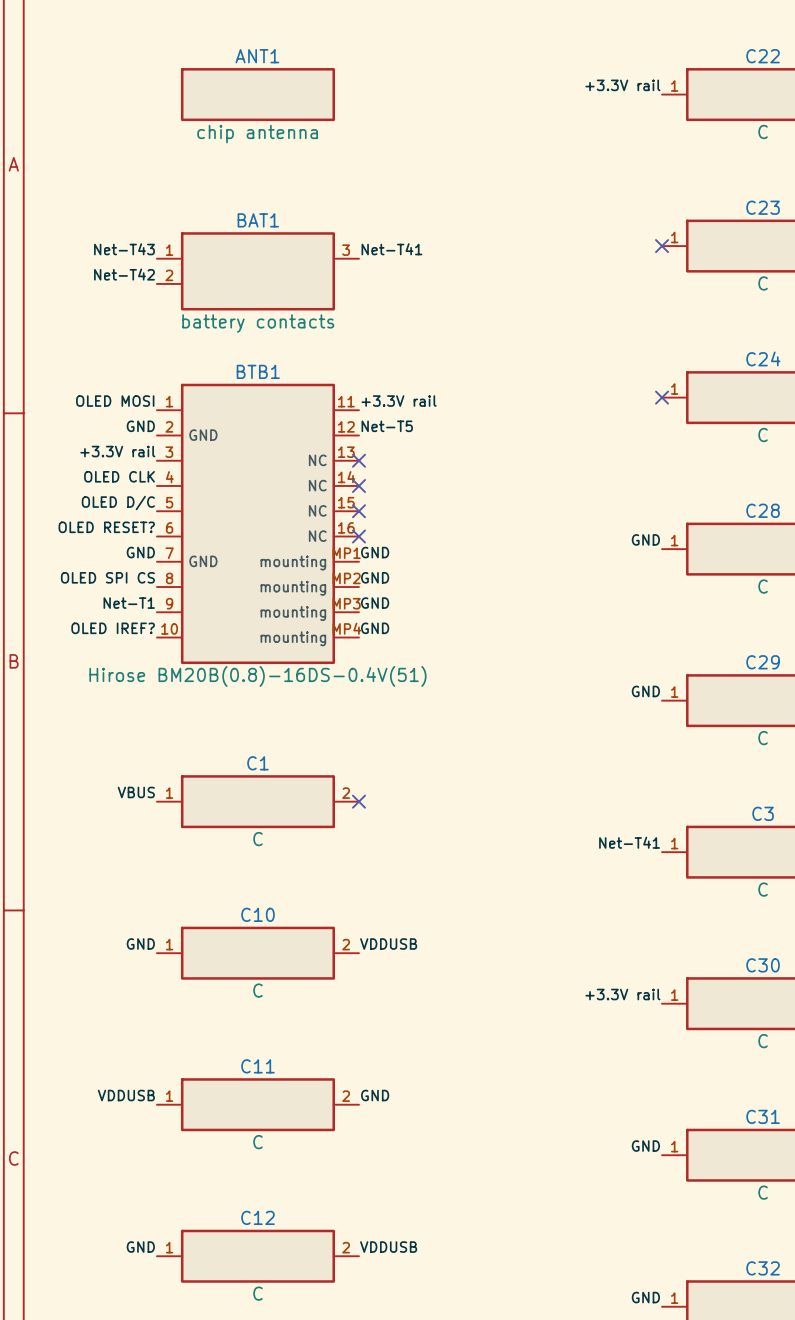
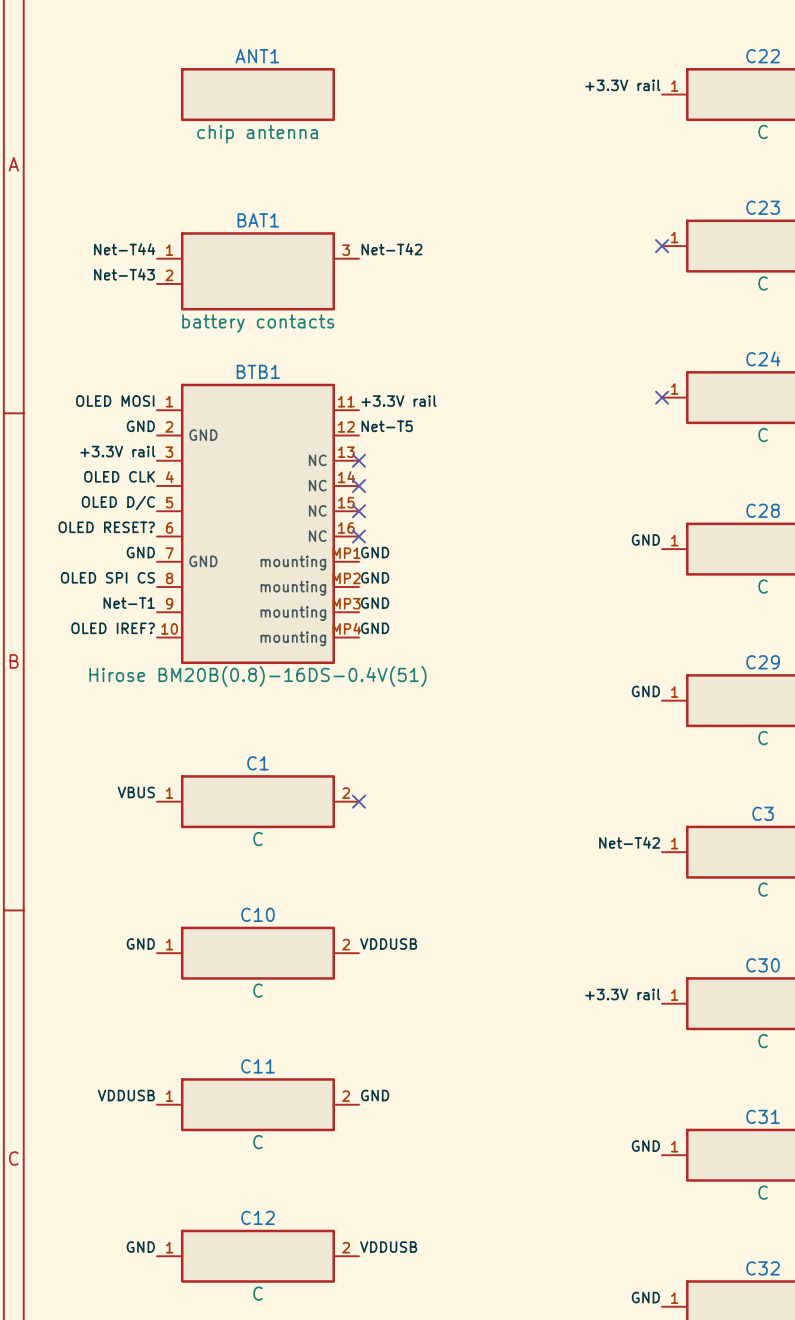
label: Net-T43 (124, 249) -> Net-T44 (124, 249)
label: Net-T41 (391, 249) -> Net-T42 (391, 249)
label: Net-T42 (124, 274) -> Net-T43 (124, 274)
label: Net-T41 (629, 842) -> Net-T42 (629, 842)

